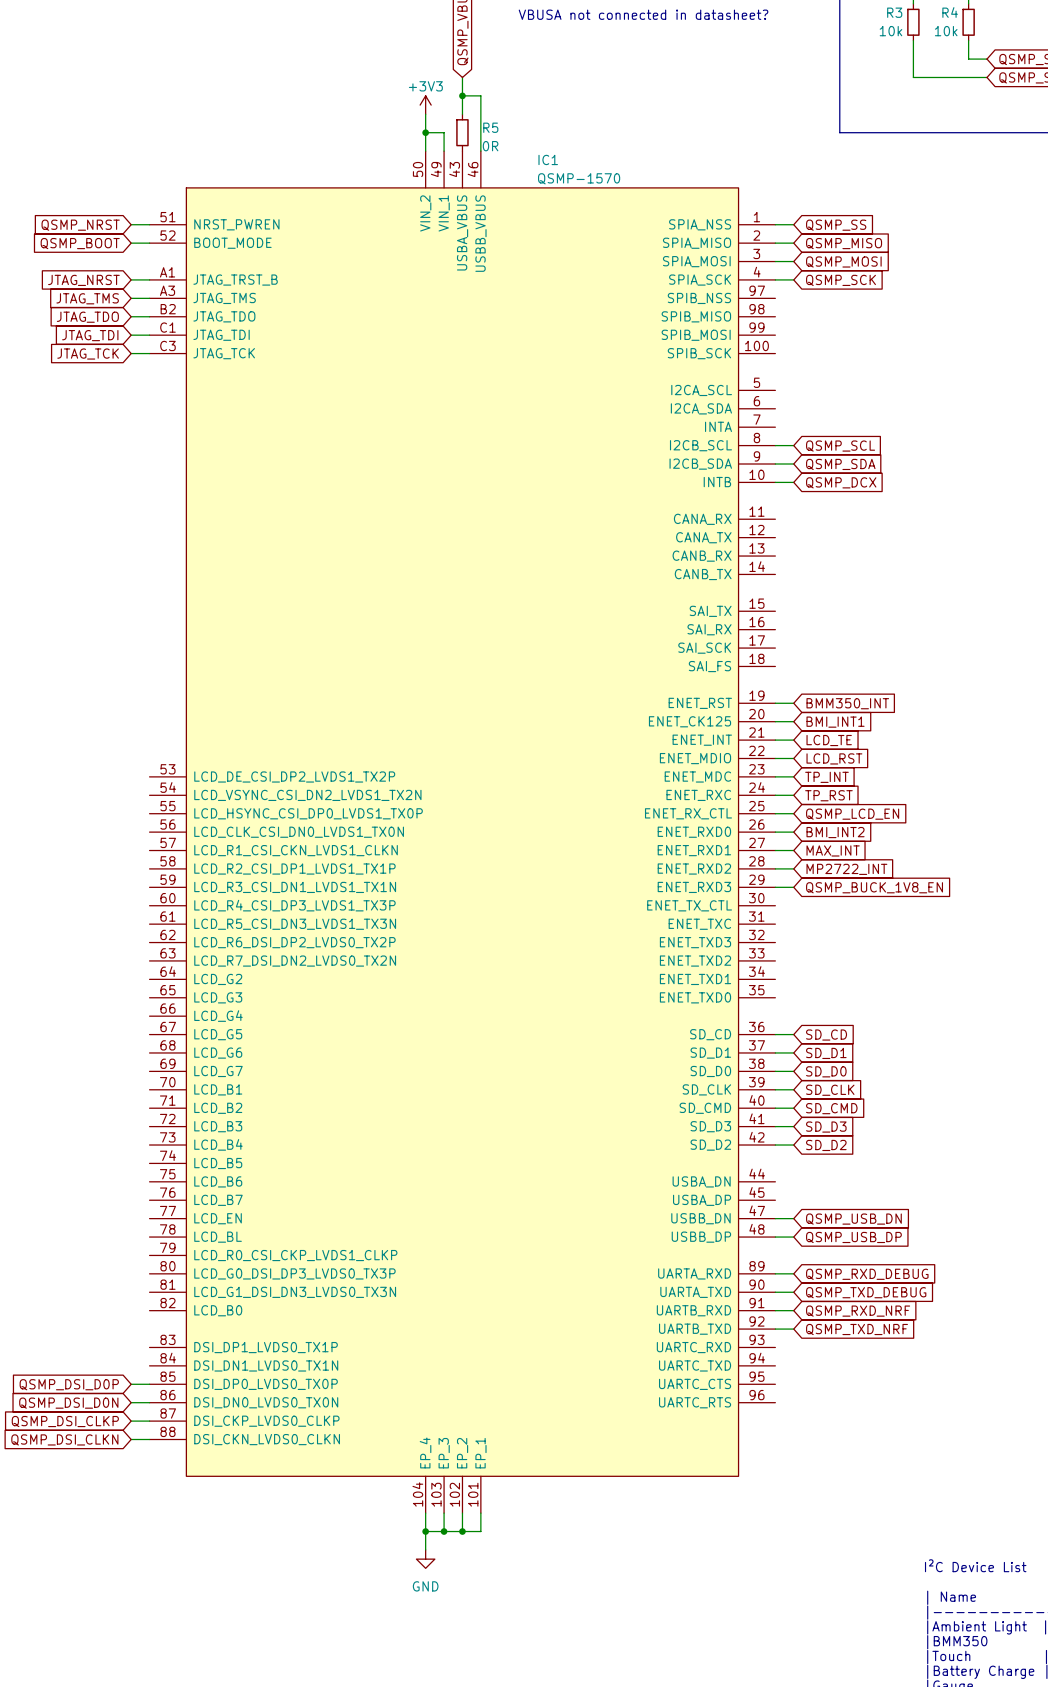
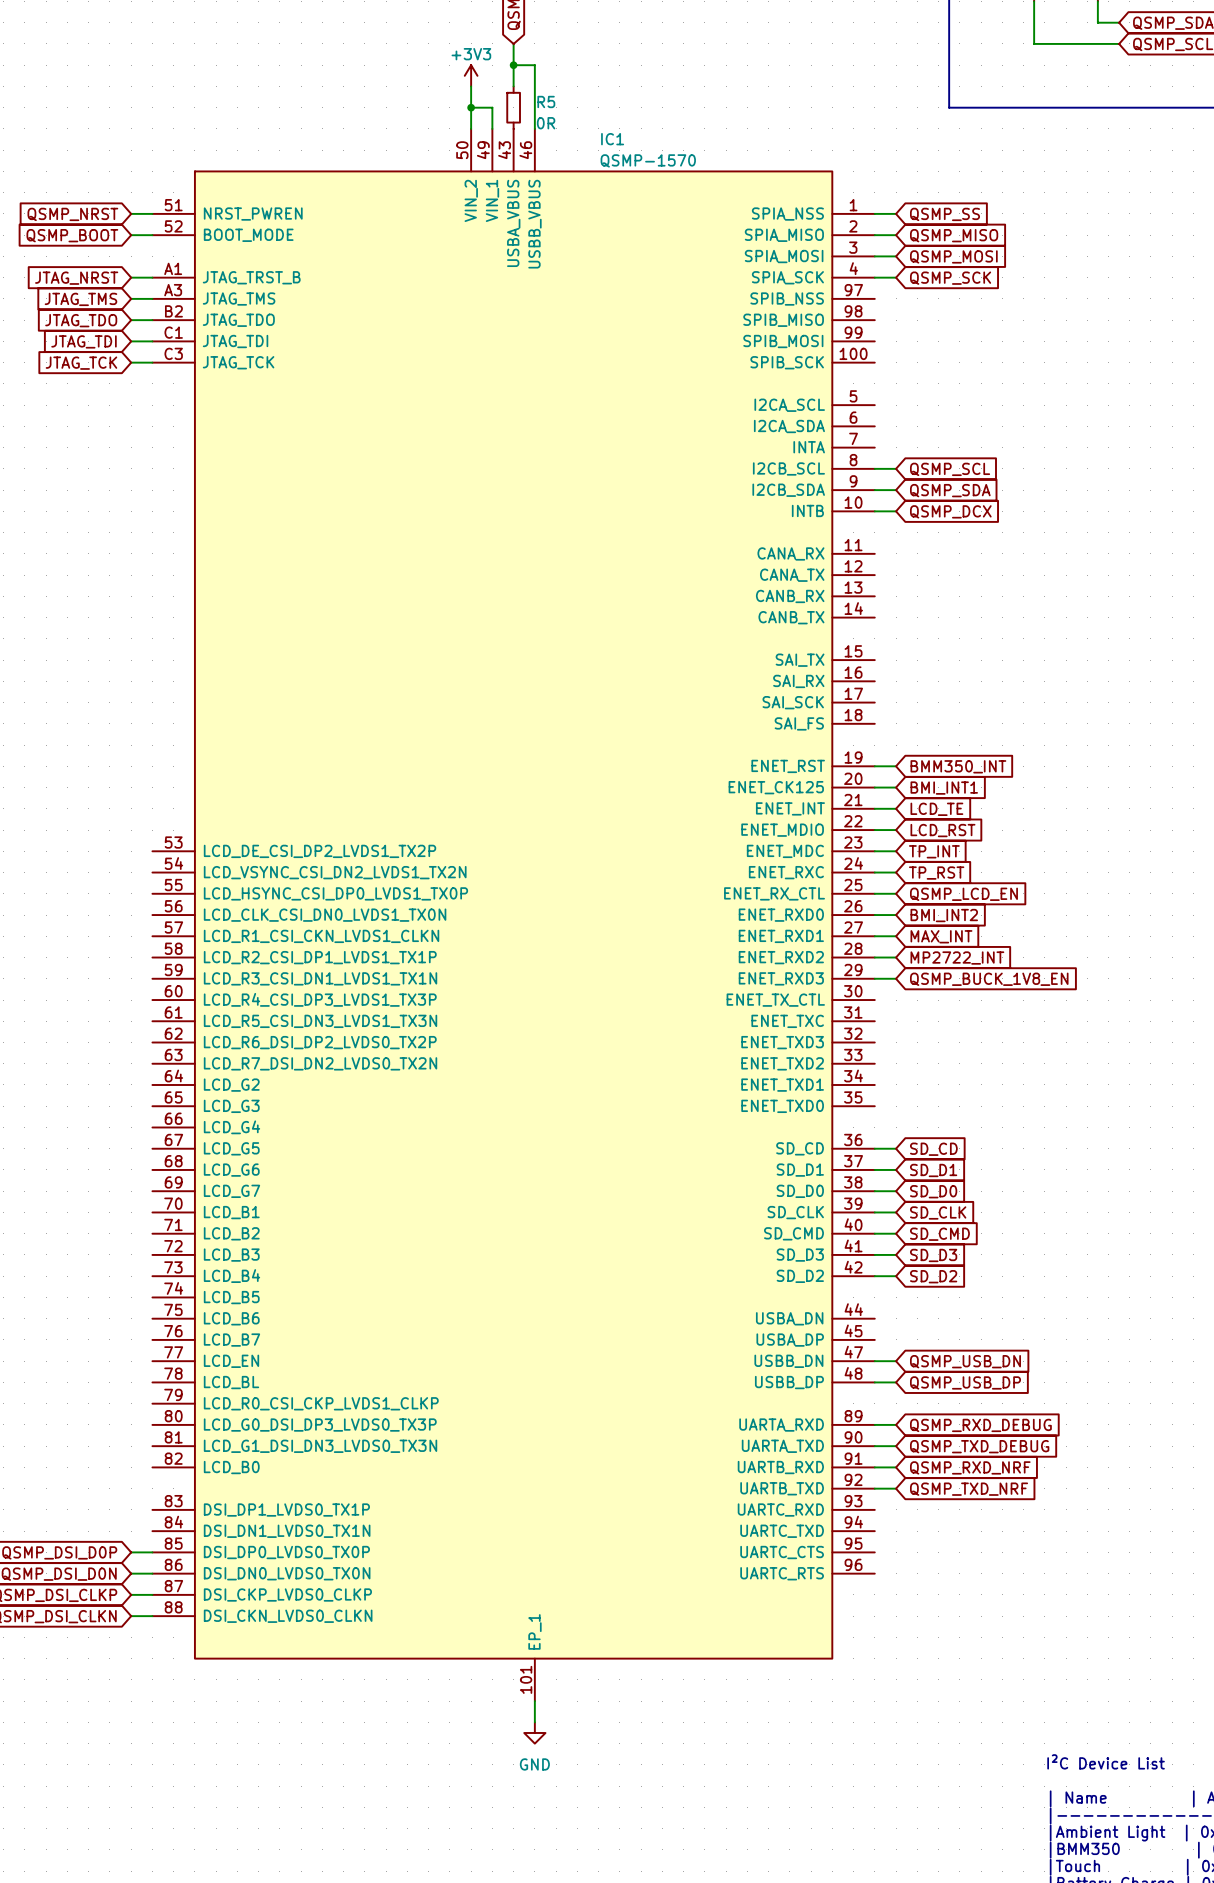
IC1 symbol: [149, 151, 776, 1514] -> [152, 128, 875, 1702]
wire: (425, 1513) (425, 1549) -> none
wire: (444, 1513) (444, 1531) -> none
wire: (462, 1513) (462, 1531) -> none
wire: (425, 1531) (480, 1531) -> none
junction: (425, 1531) -> none
junction: (444, 1531) -> none
junction: (462, 1531) -> none
power symbol position: GND (425, 1559) -> GND (534, 1732)

